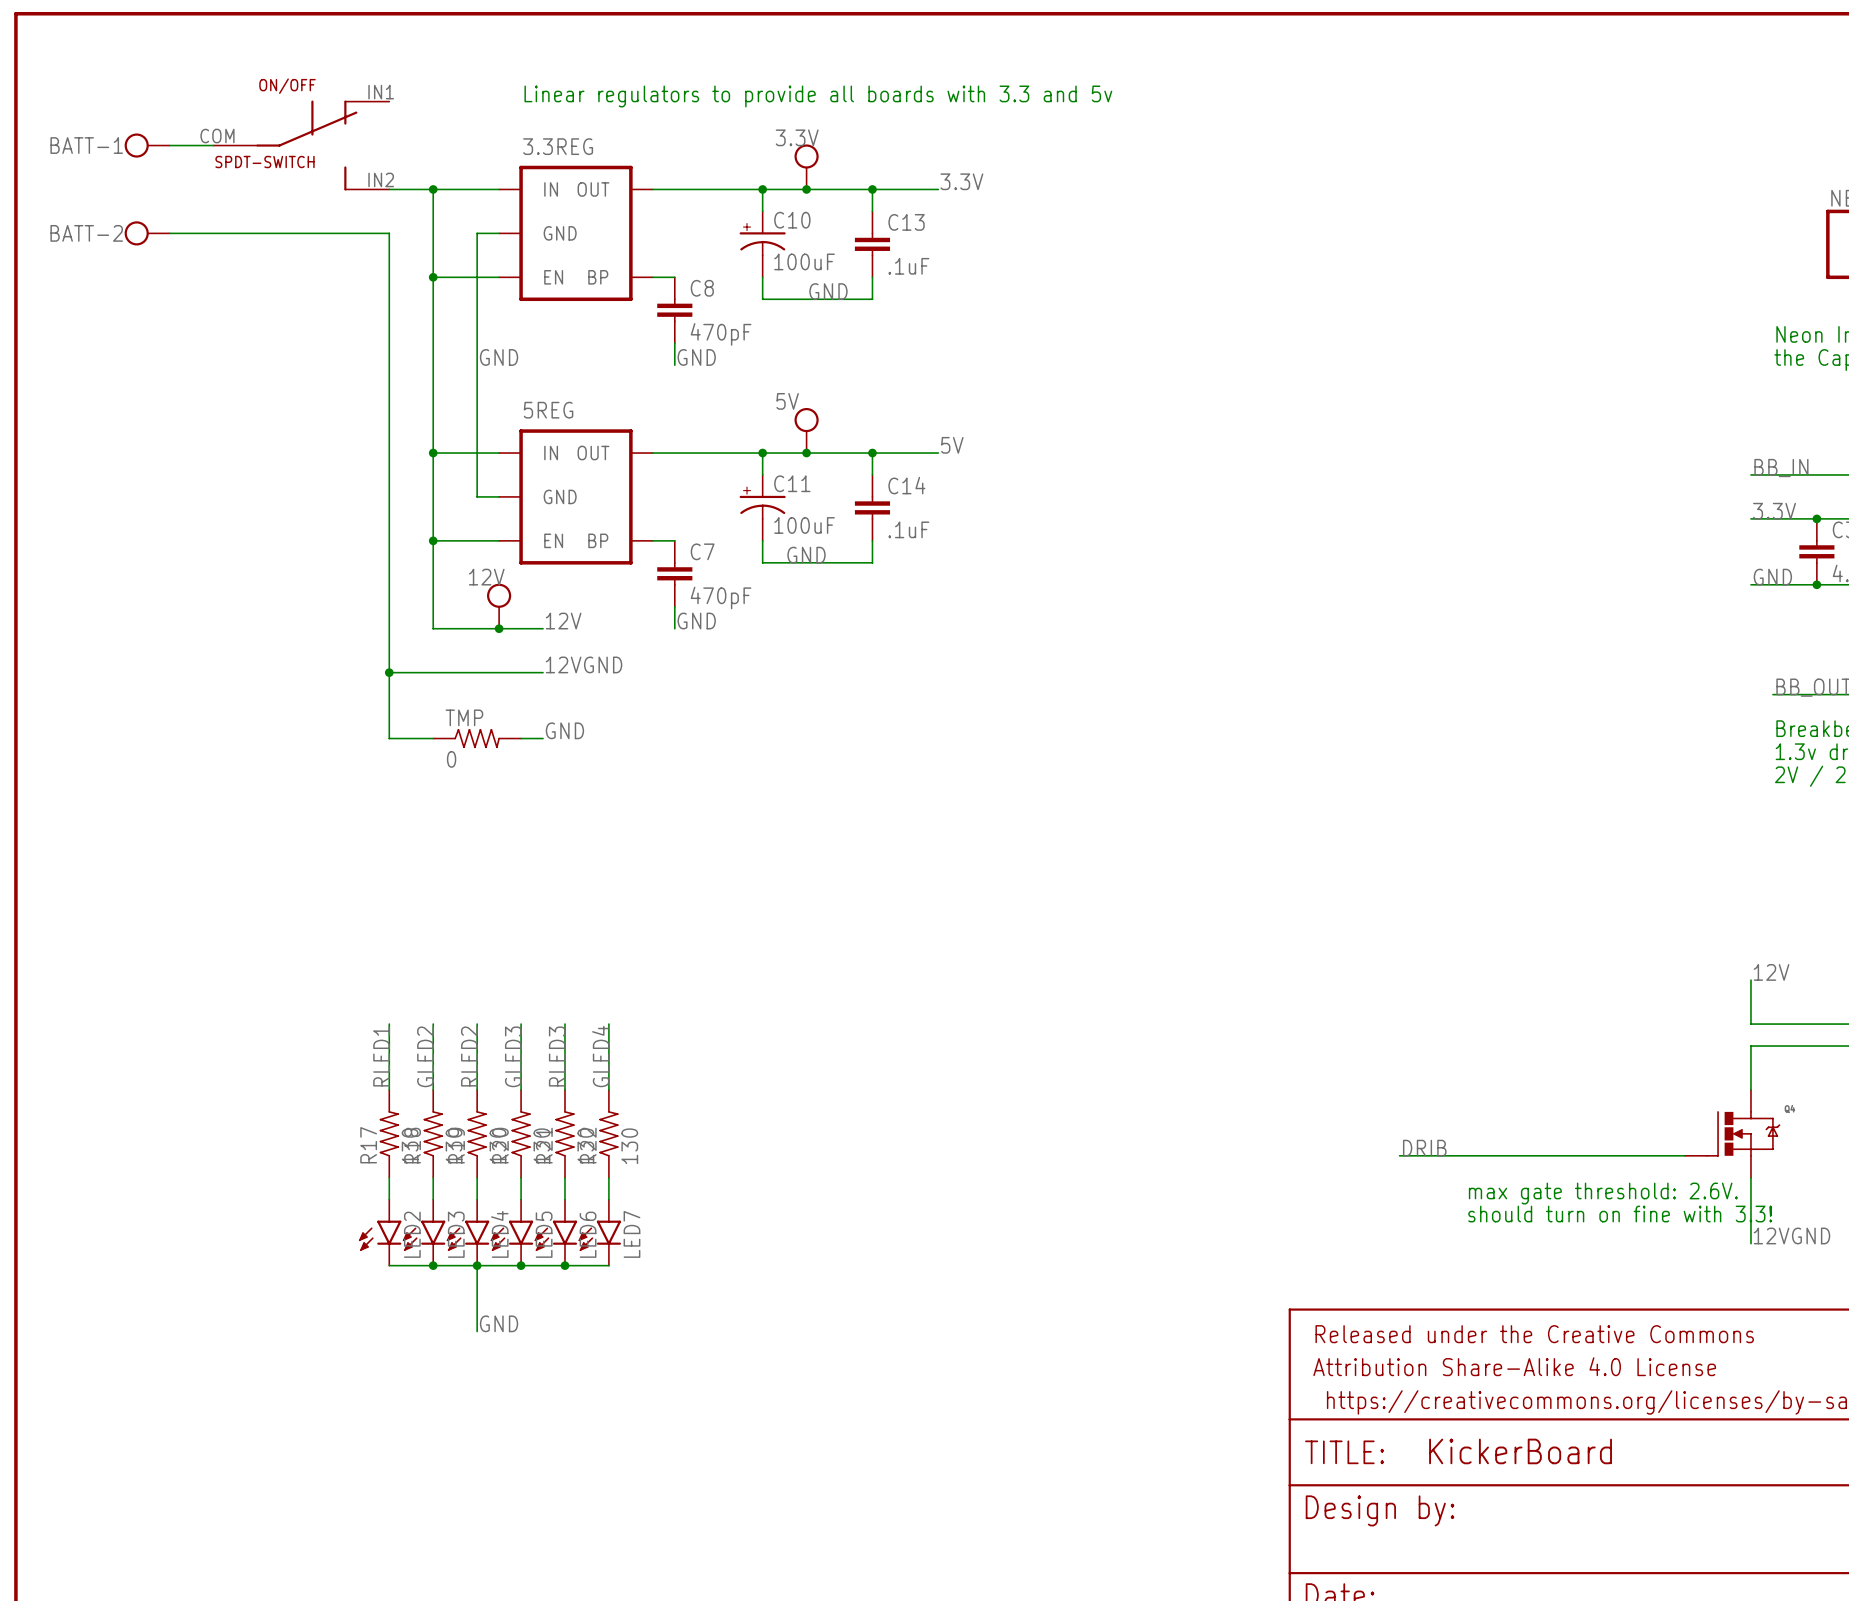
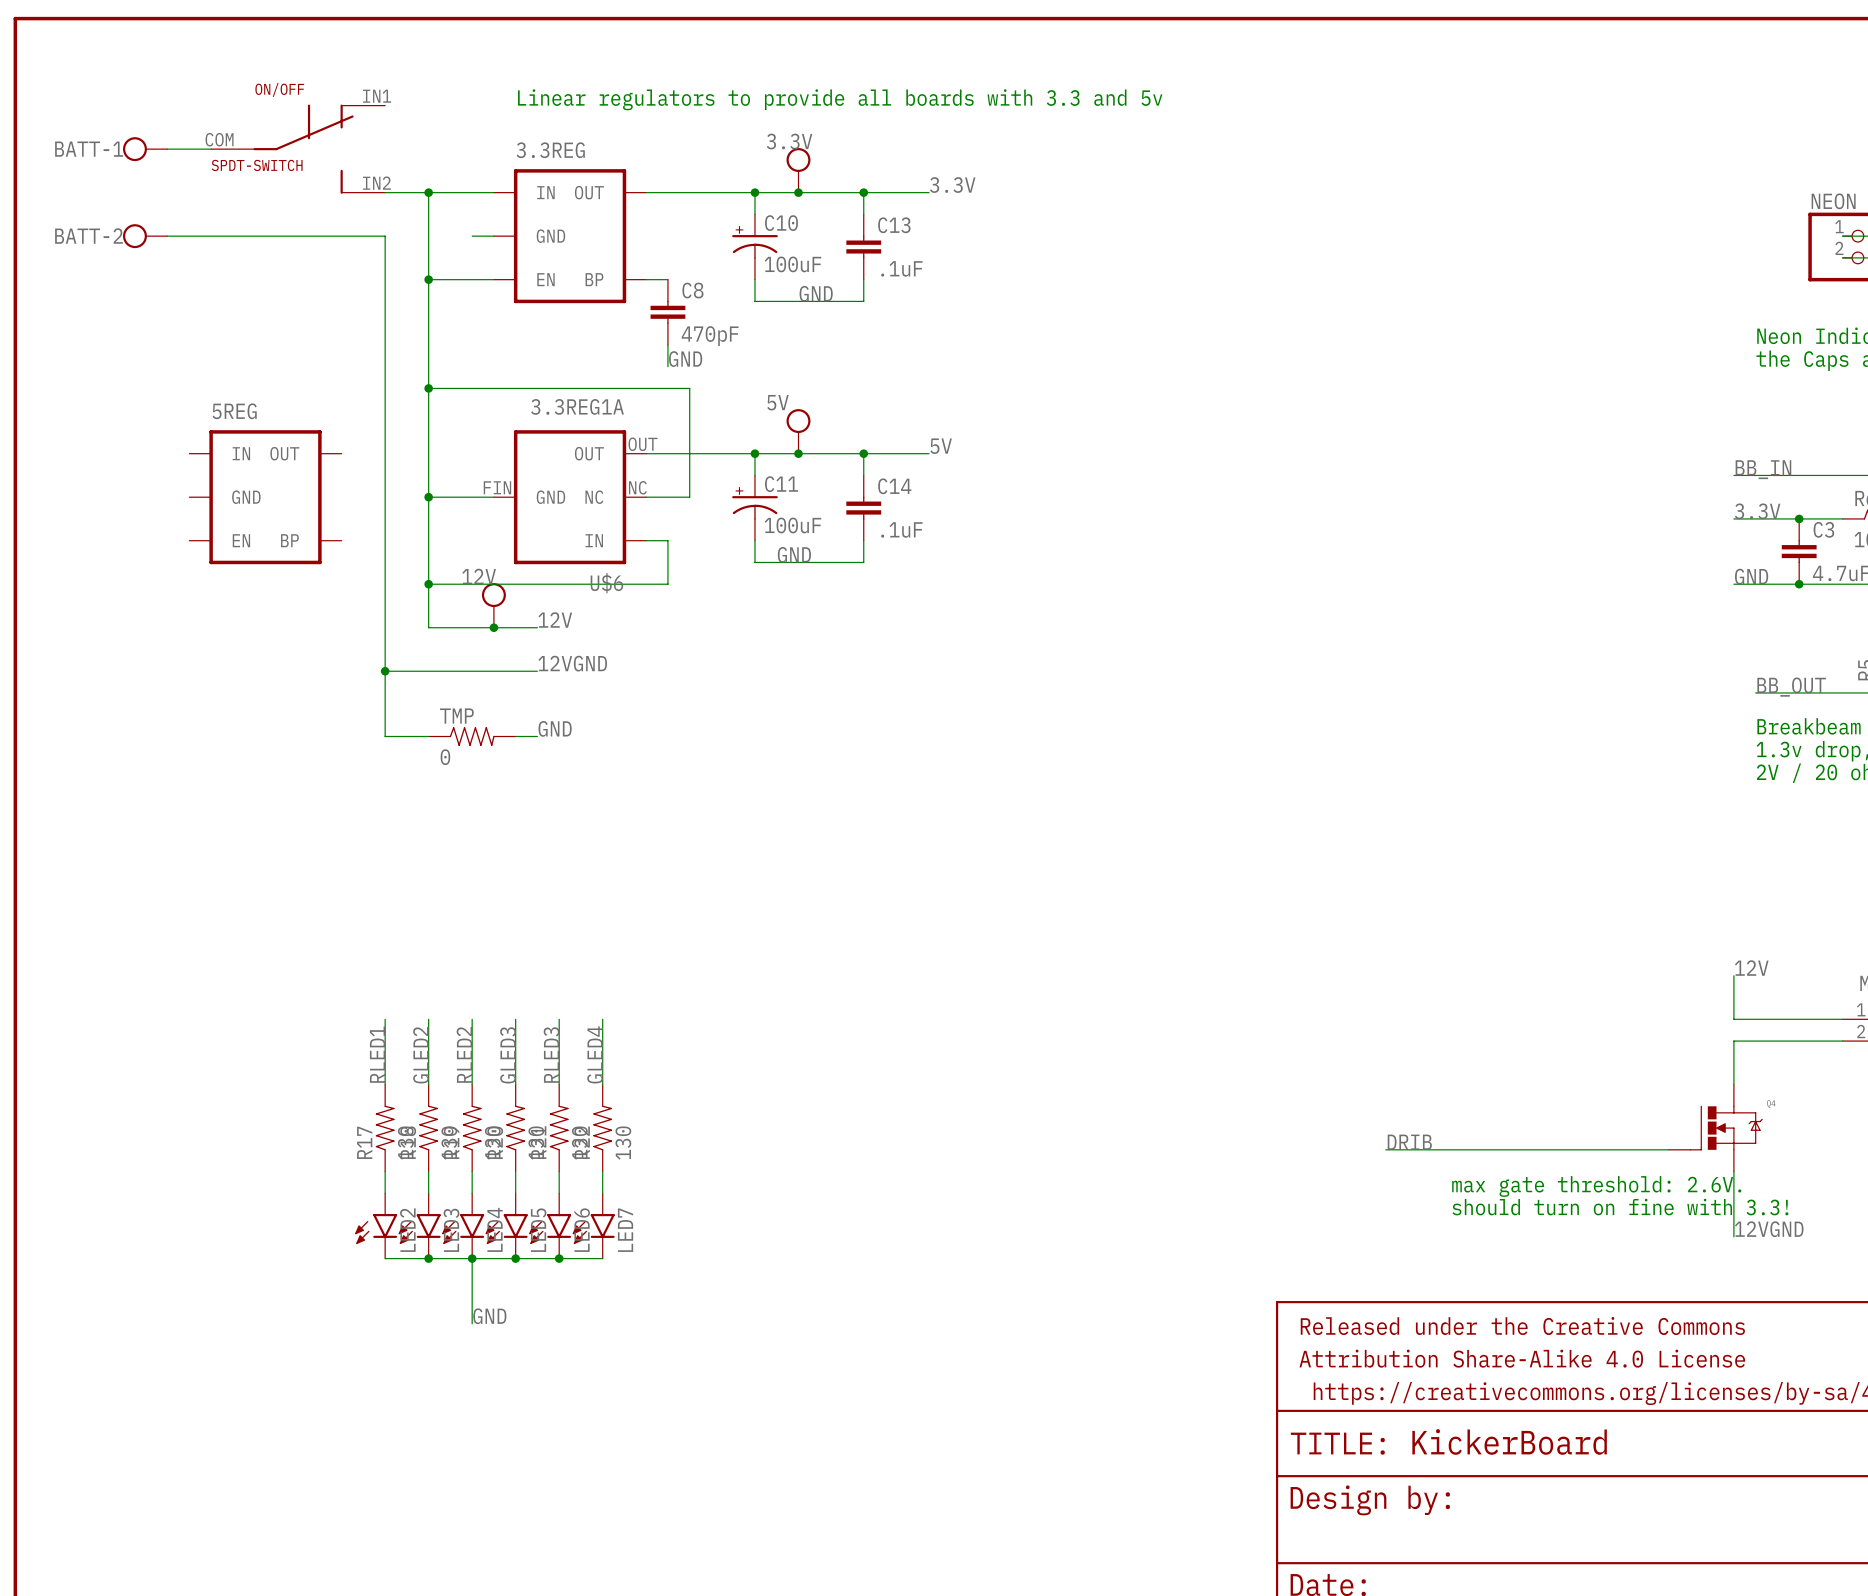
wire: (477, 233) (477, 496) -> (428, 497) (472, 497)
label: GND (499, 357) -> none
wire: none -> (428, 388) (689, 388) (689, 497) (646, 497)
junction: none -> (428, 388)
wire: (433, 453) (499, 453) -> none
junction: (433, 453) -> none
junction: none -> (428, 497)
5REG position: (575, 496) -> (265, 497)
U$6: none -> 3.3REG1A (570, 497)
wire: (433, 540) (499, 540) -> none
junction: (433, 540) -> none
wire: none -> (667, 540) (667, 584) (428, 584)
C7: 470pF (674, 573) -> none
junction: none -> (428, 584)
wire: (674, 606) (674, 628) -> none
label: GND (696, 621) -> none

